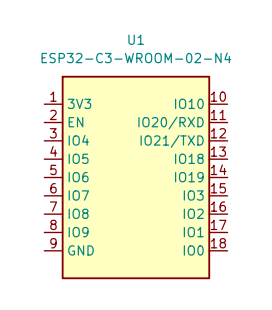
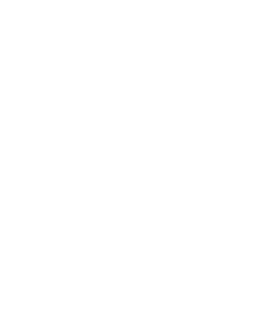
U1: ESP32-C3-WROOM-02-N4 (135, 177) -> none

